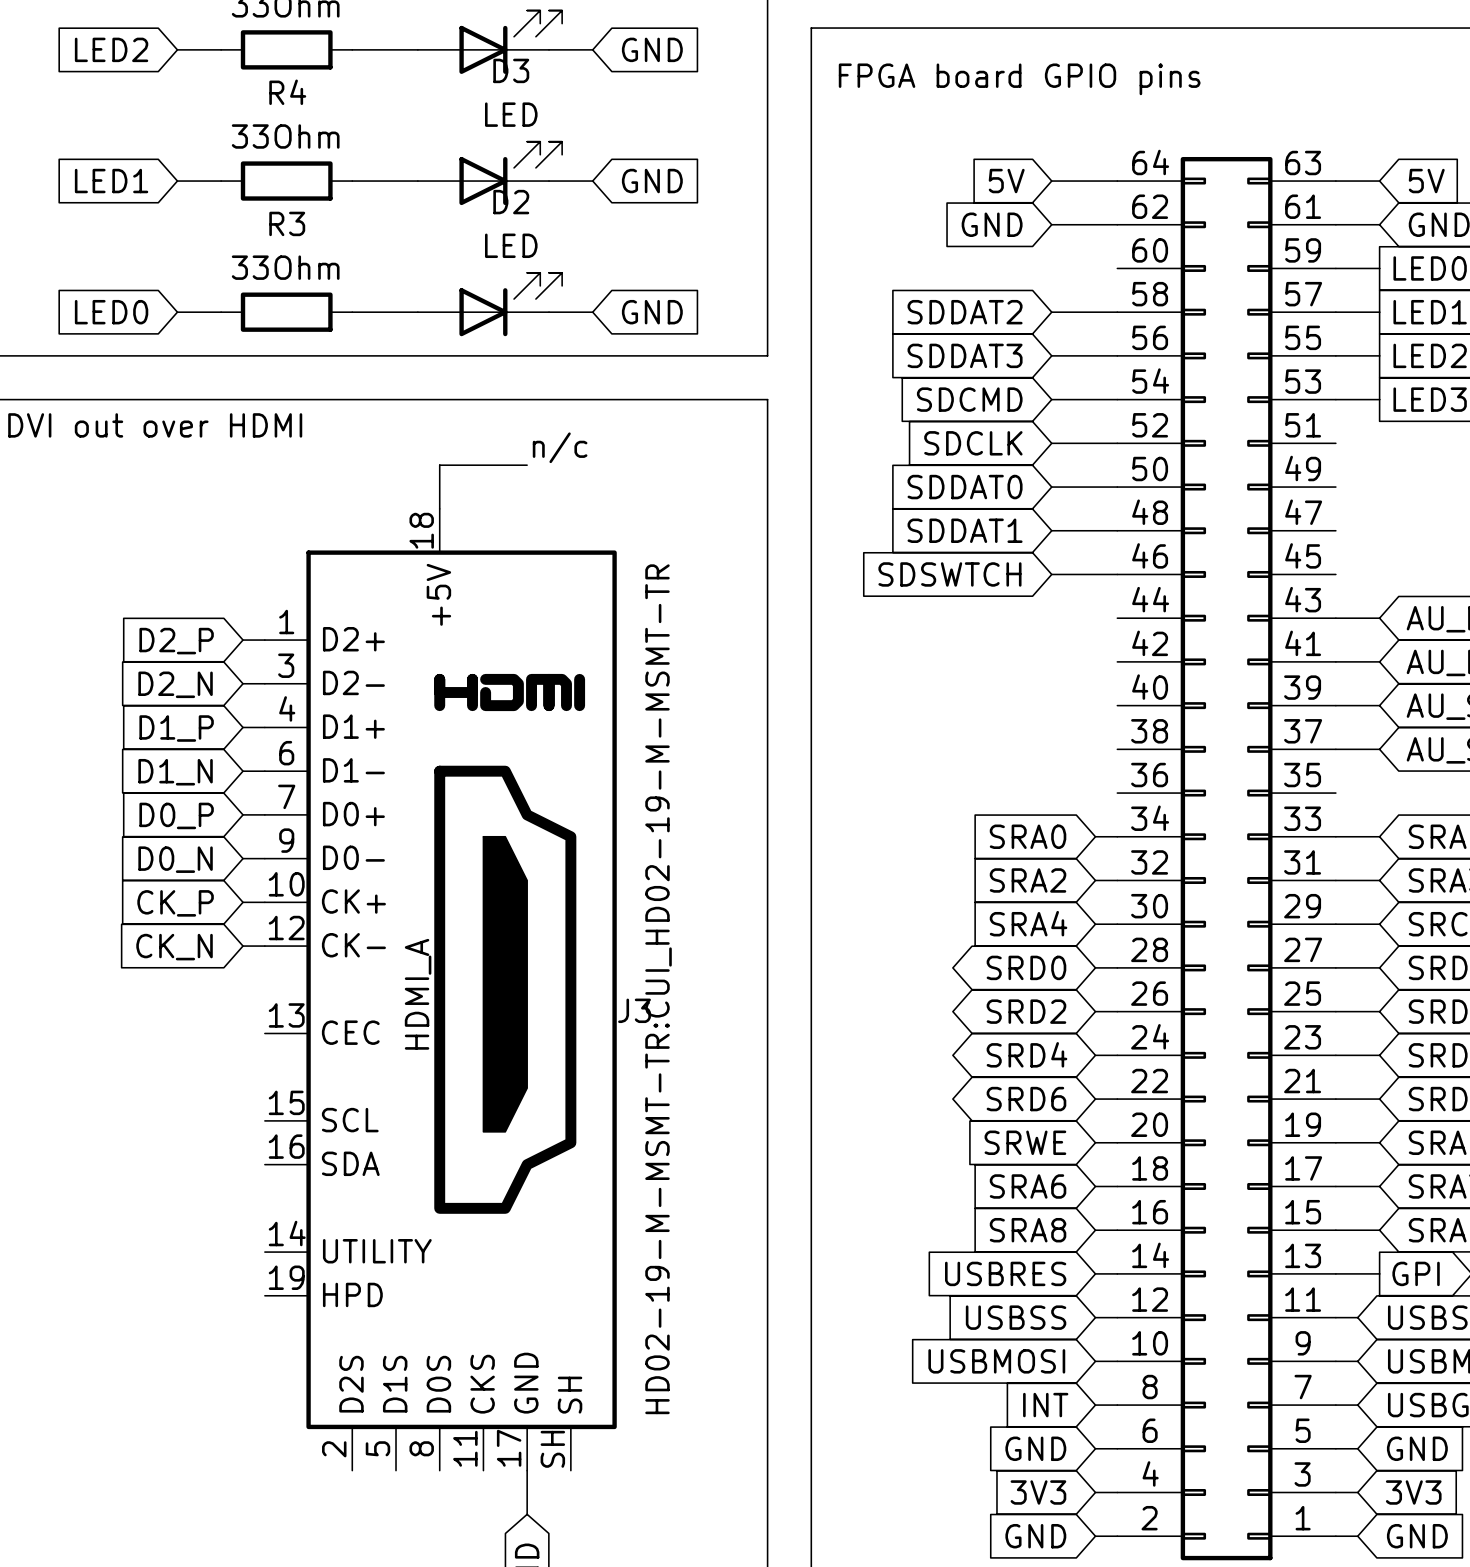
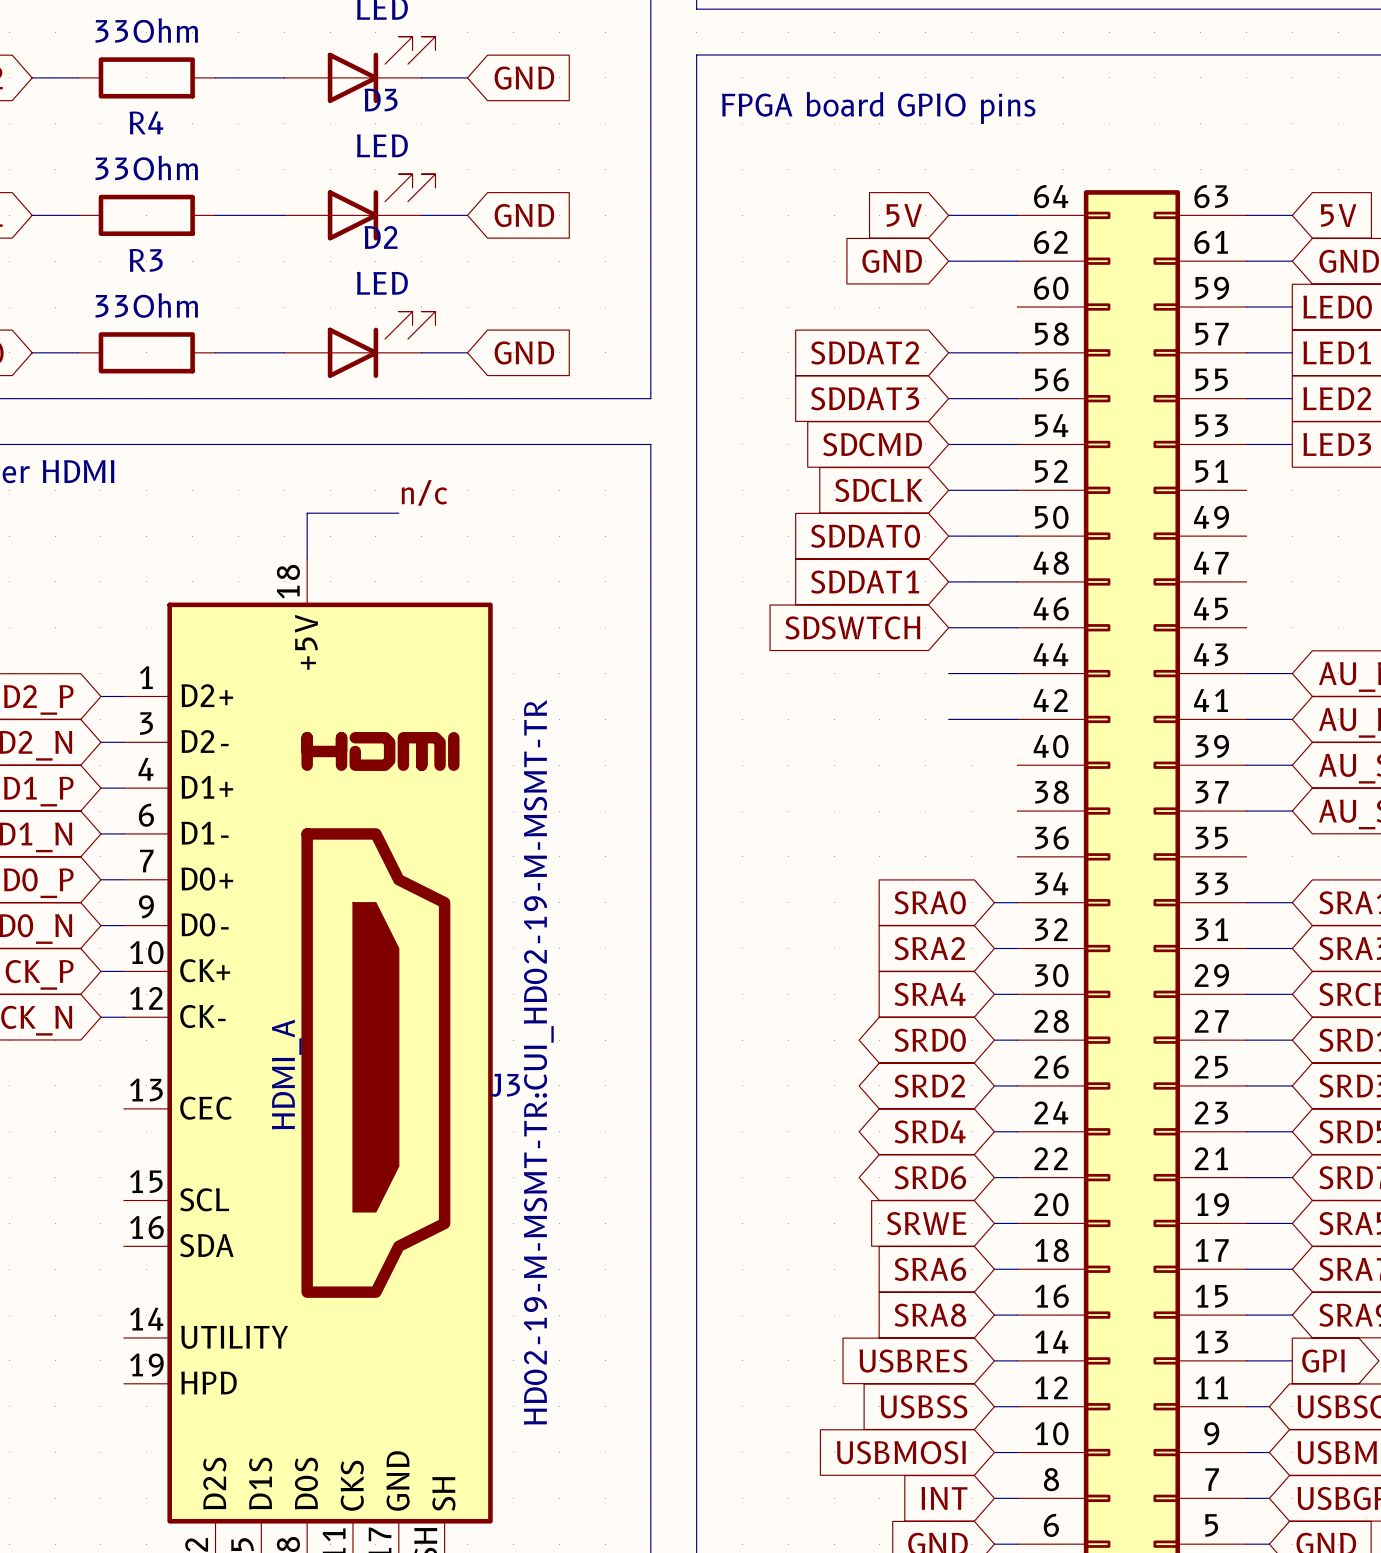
wire: none -> (948, 673) (1017, 673)
wire: none -> (948, 719) (1017, 719)

